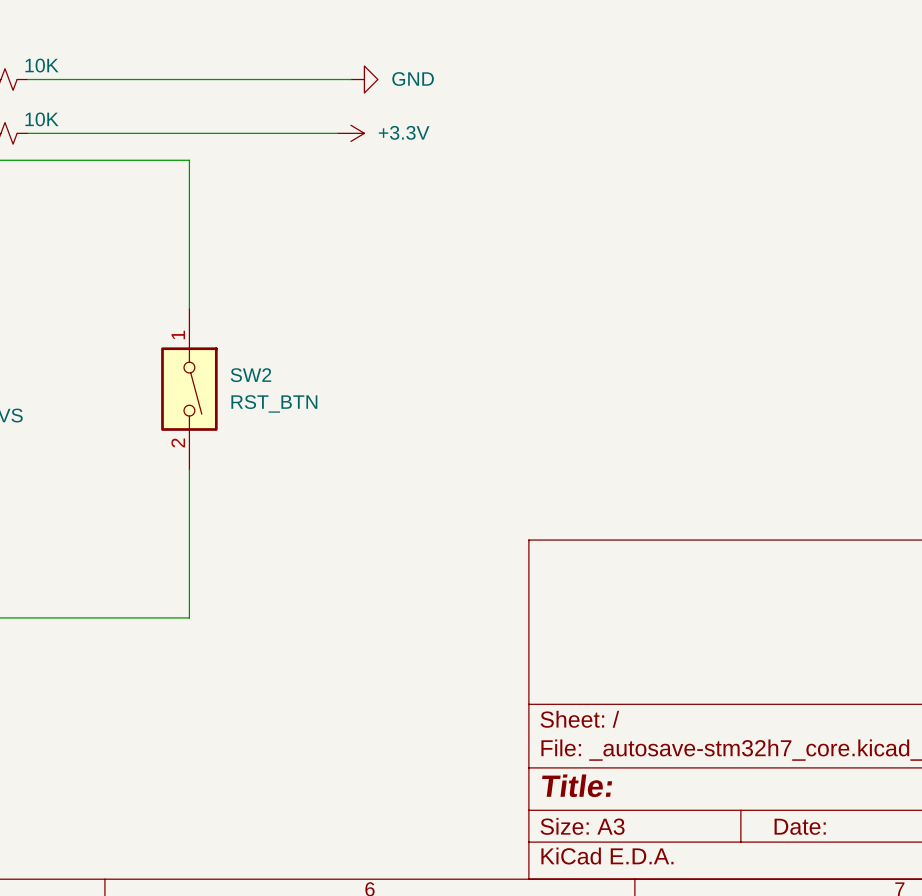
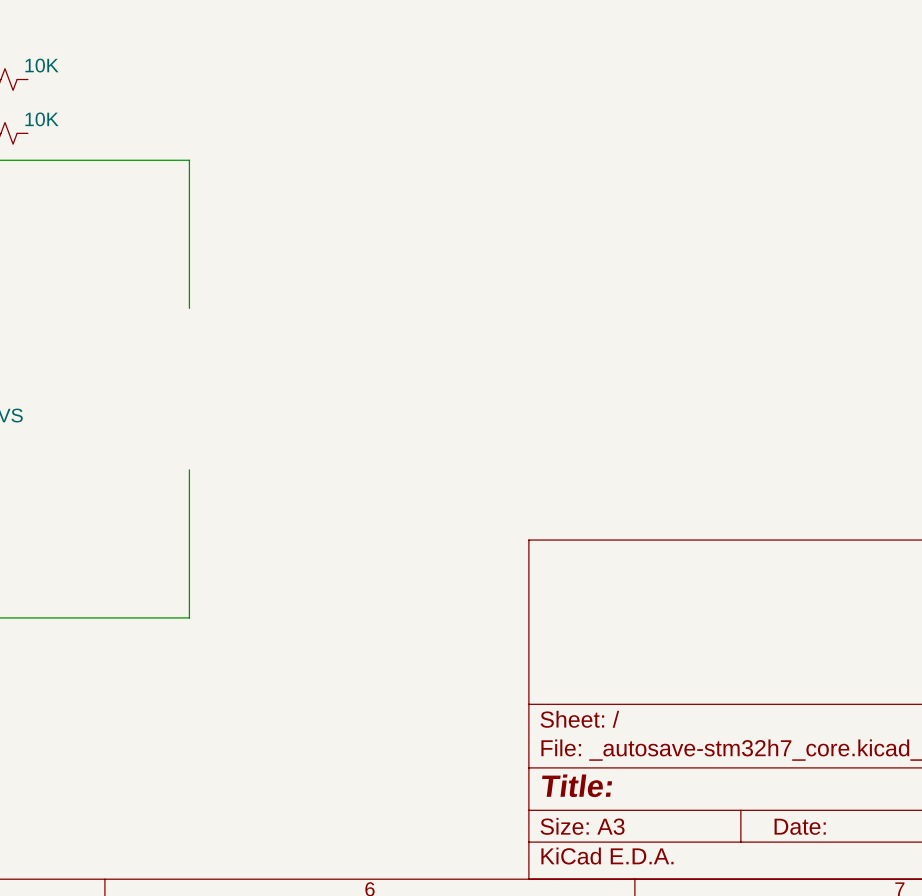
wire: (27, 79) (350, 79) -> none
power symbol: GND (364, 79) -> none
wire: (27, 133) (337, 133) -> none
power symbol: +3.3V (350, 133) -> none
SW2: RST_BTN (189, 389) -> none

